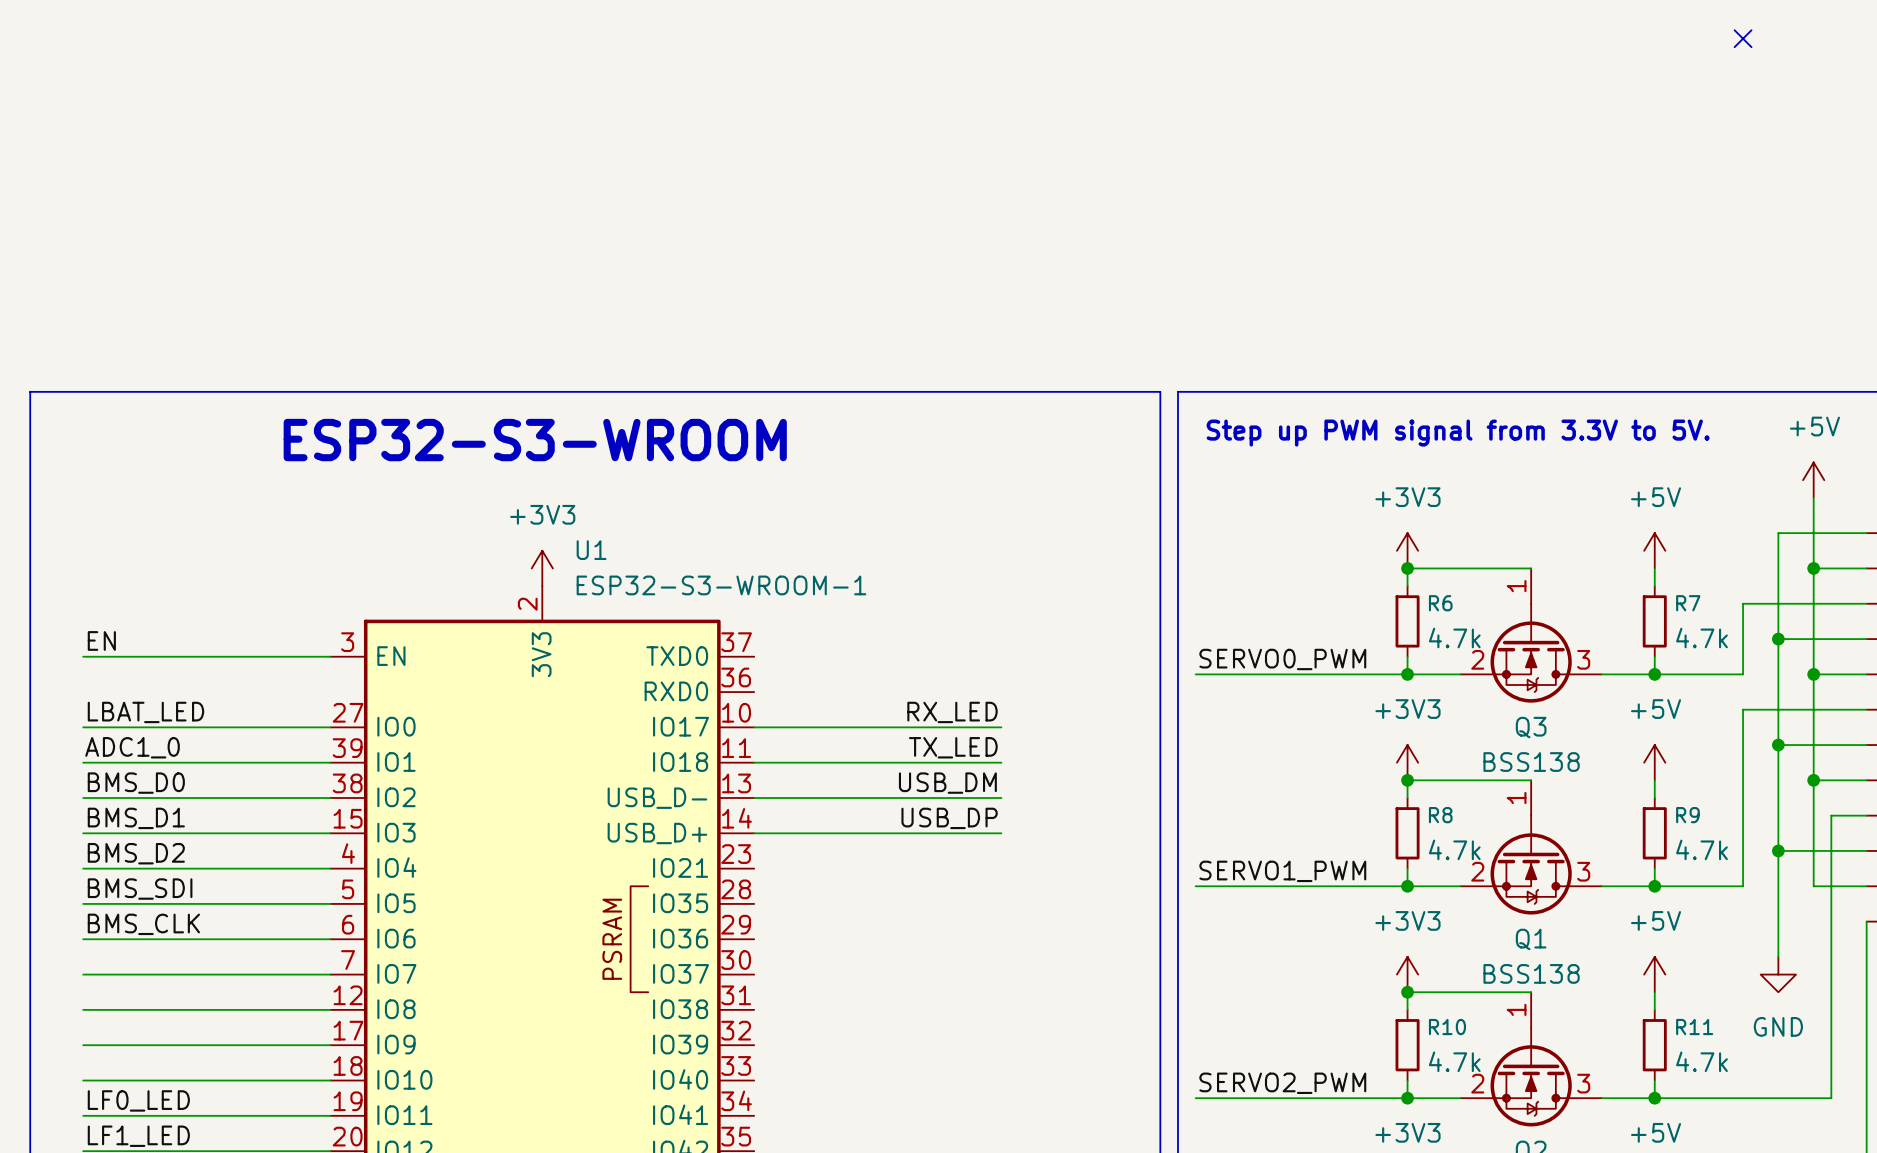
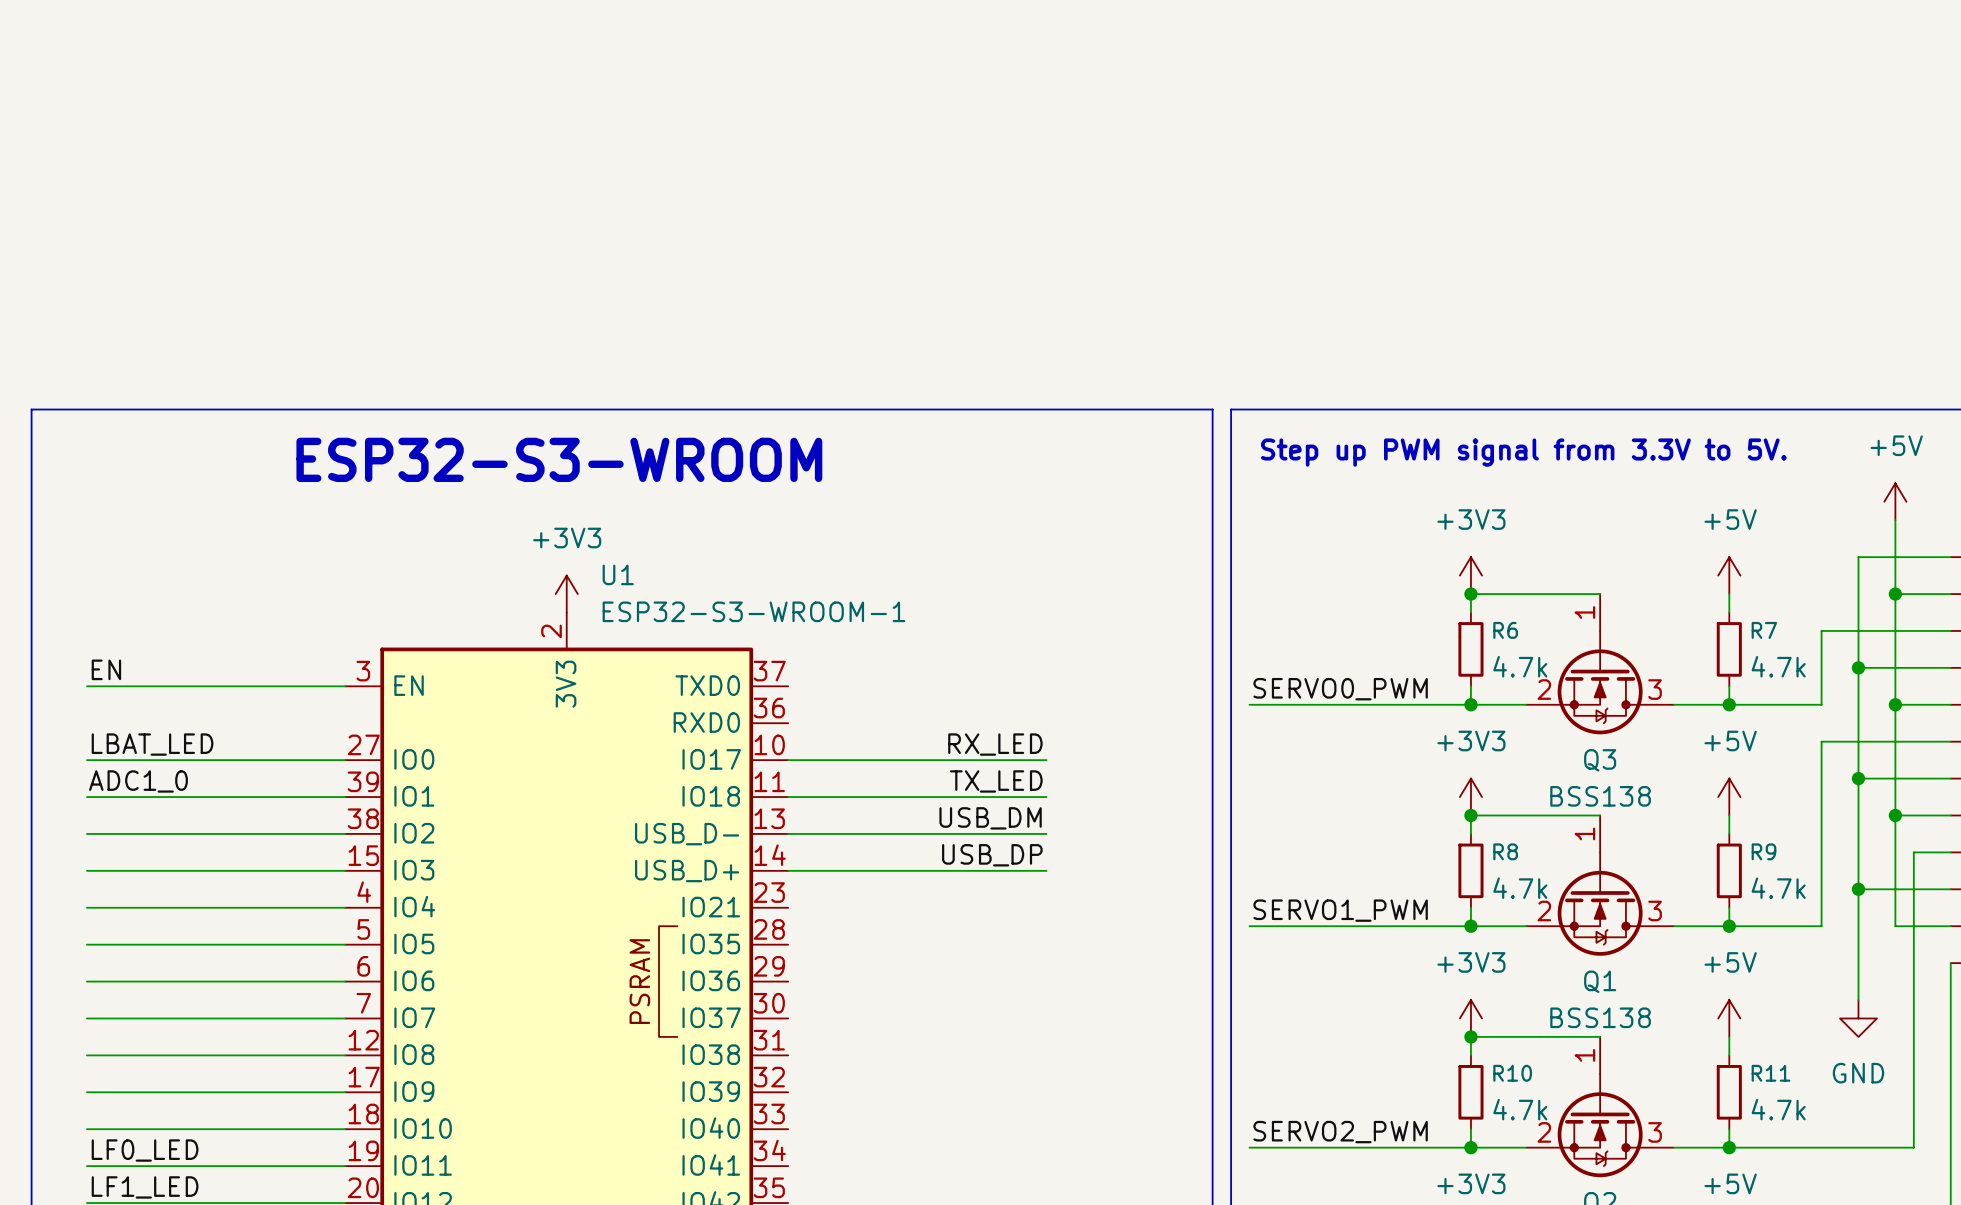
no-connect mark: (1743, 38) -> none
label: BMS_D0 (136, 783) -> none
label: BMS_D1 (136, 818) -> none
label: BMS_D2 (136, 853) -> none
label: BMS_SDI (140, 889) -> none
label: BMS_CLK (143, 924) -> none

